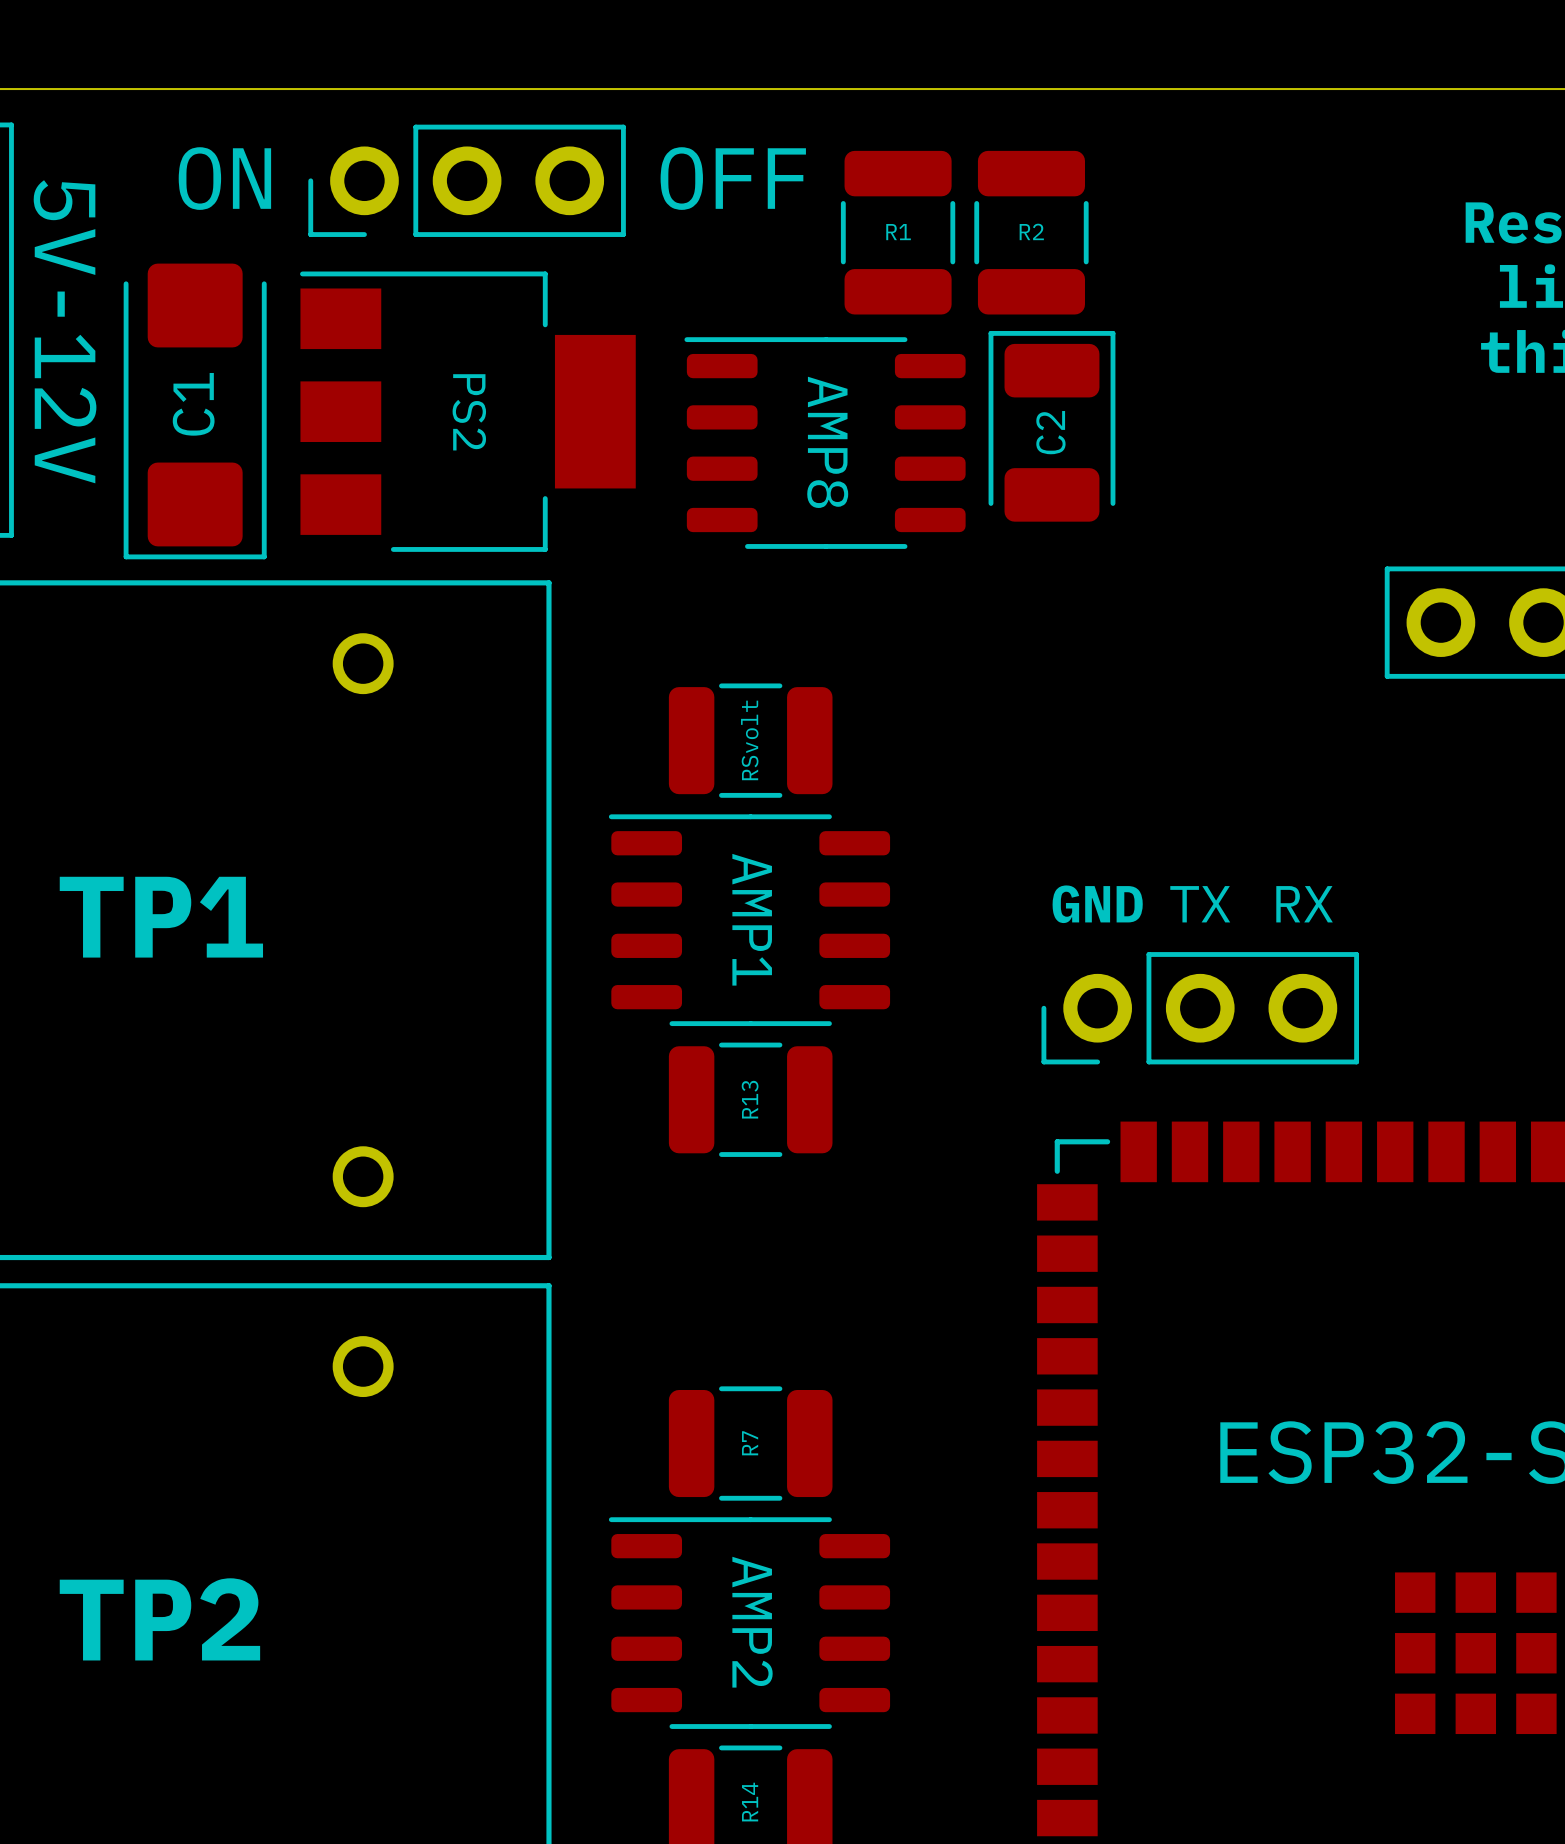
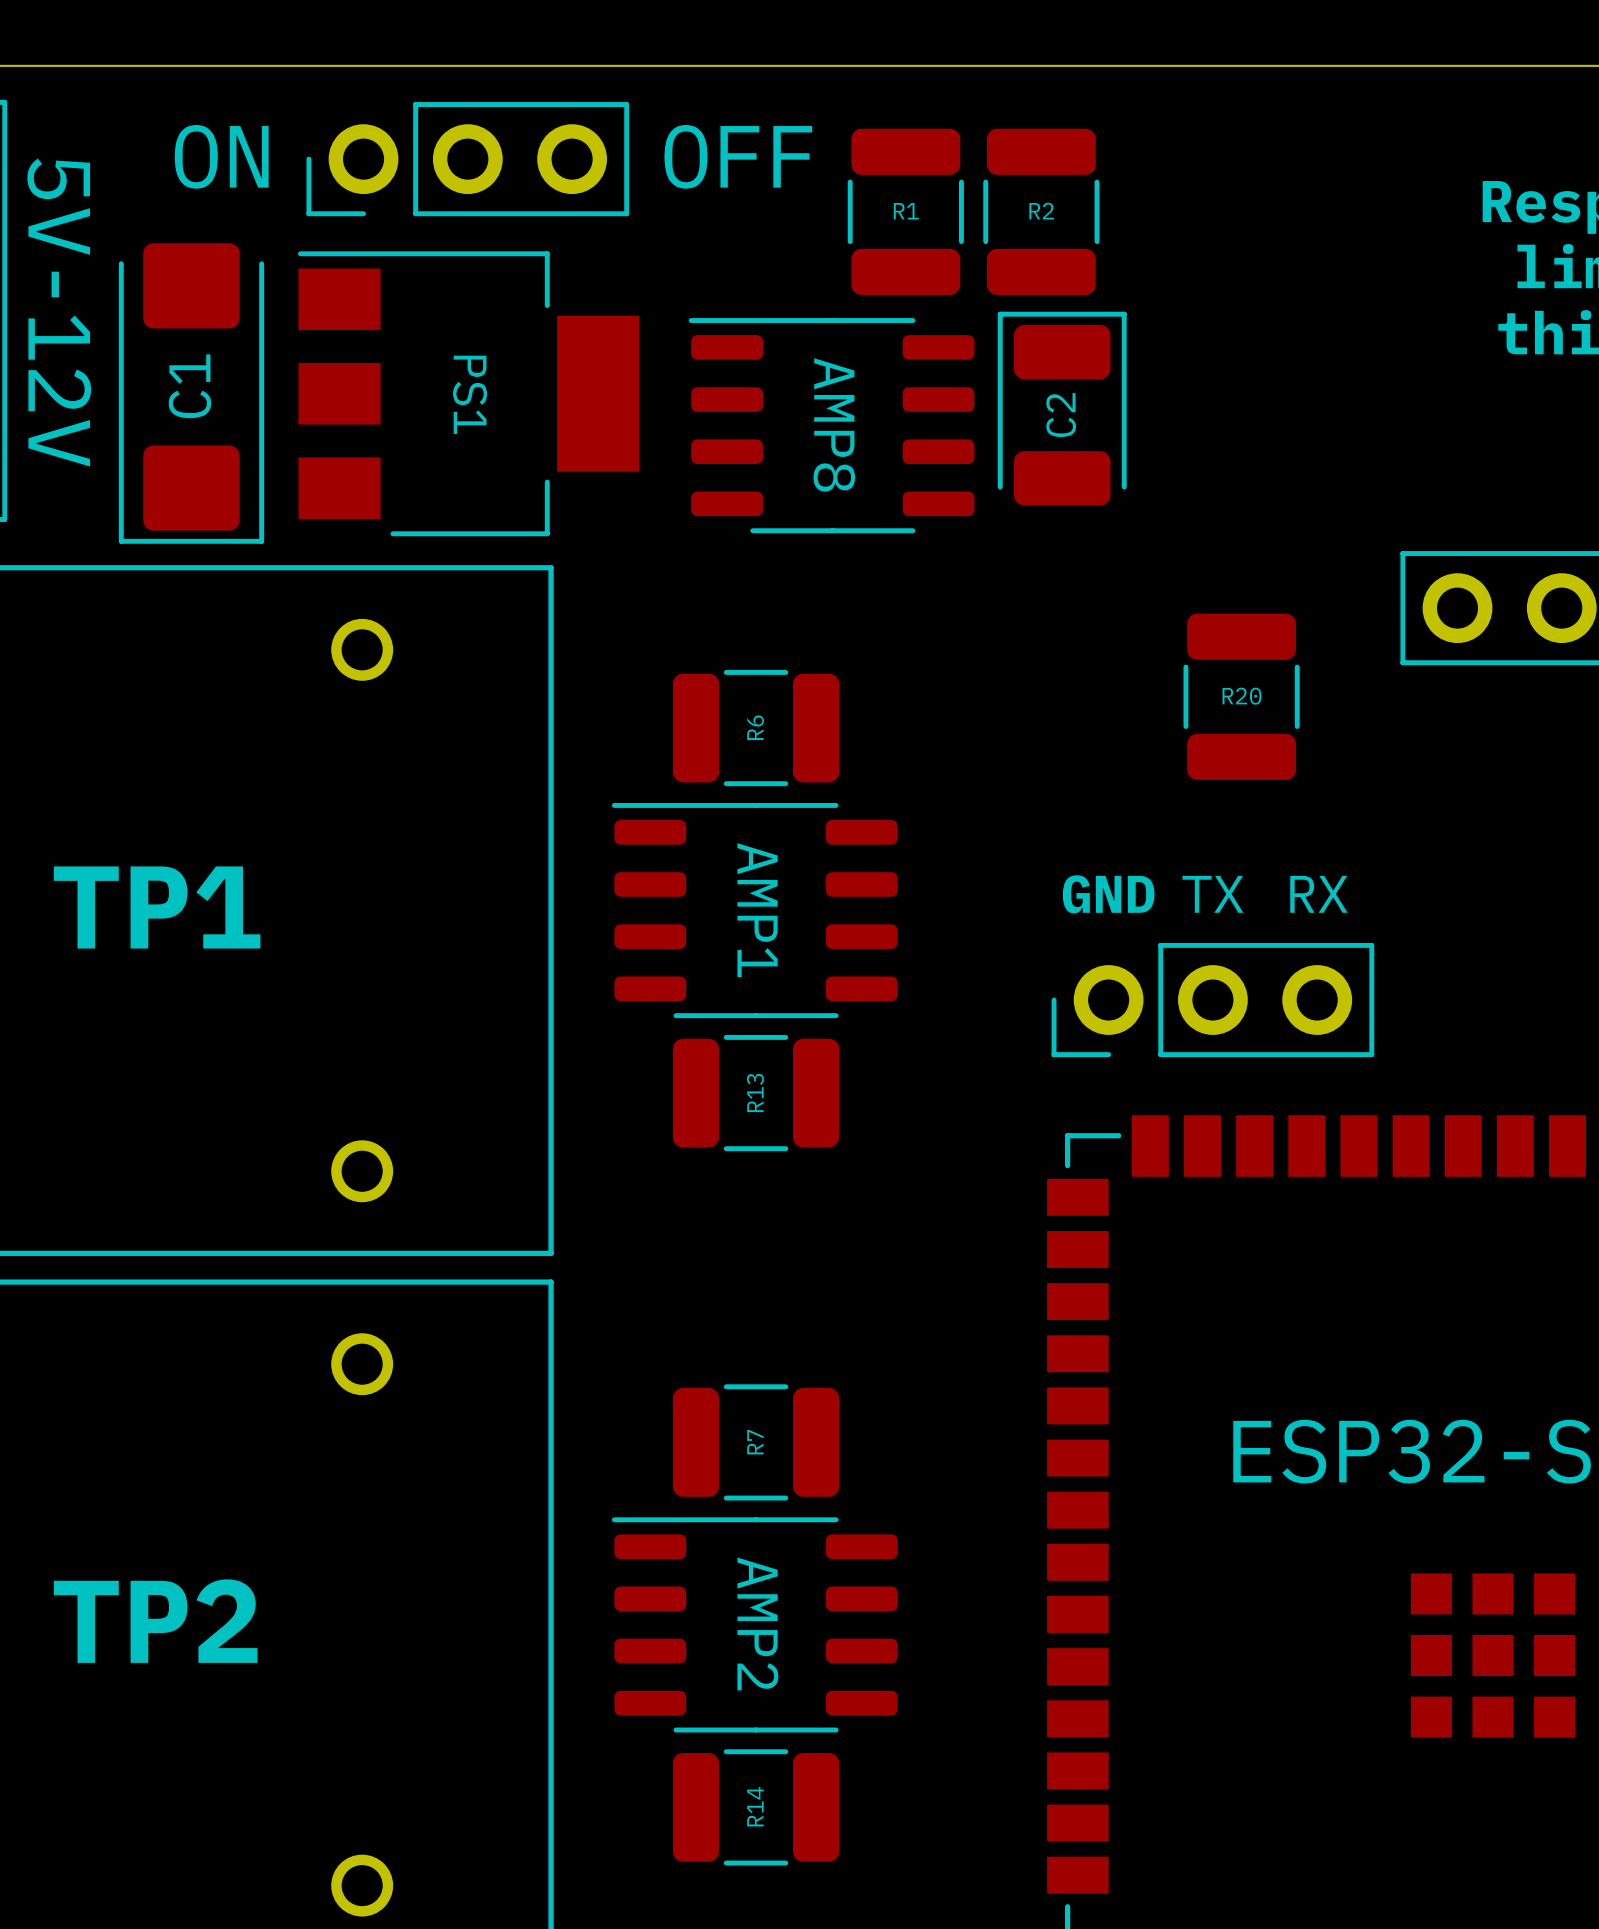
PS2 name: PS2 (469, 412) -> PS1 (470, 394)
R20: none -> (1241, 696)
R6 value: RSvolt (749, 740) -> none
R6 name: none -> R6 (755, 727)

